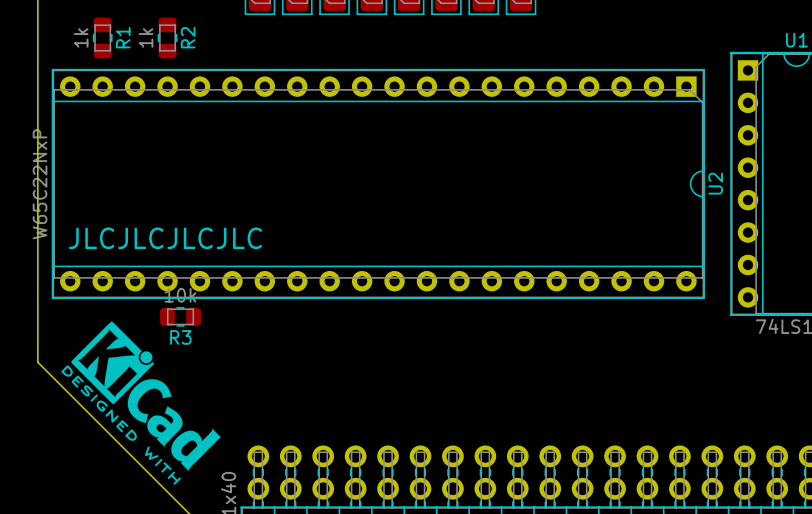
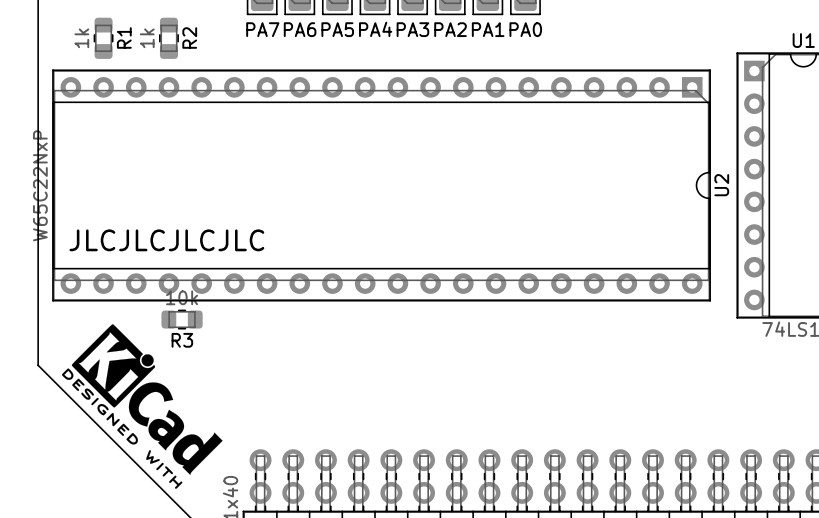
text: none -> PA7 (262, 29)
text: none -> PA6 (300, 29)
text: none -> PA5 (337, 29)
text: none -> PA4 (375, 29)
text: none -> PA3 (412, 29)
text: none -> PA2 (450, 29)
text: none -> PA1 (488, 29)
text: none -> PA0 (525, 29)

